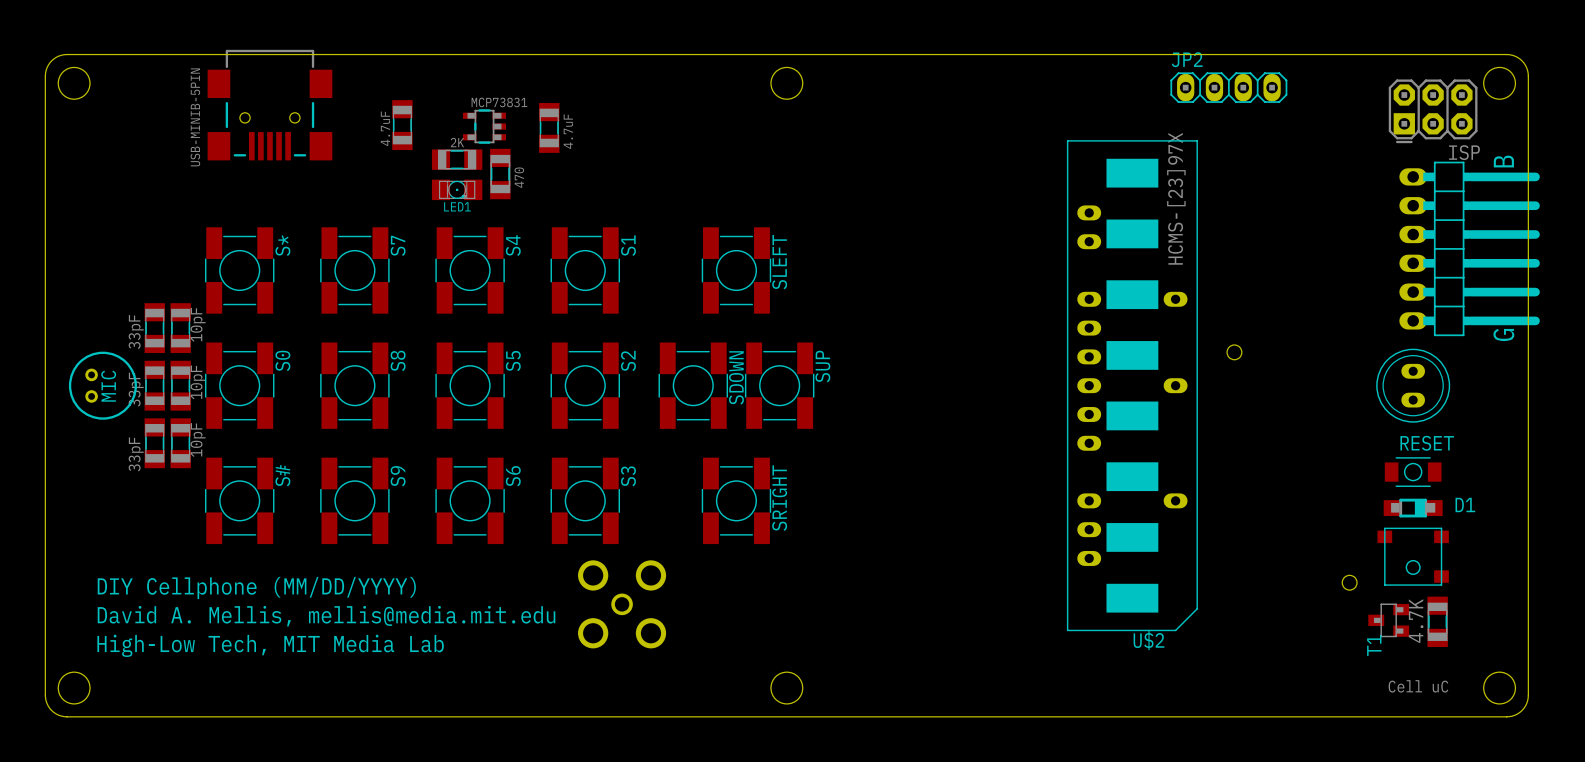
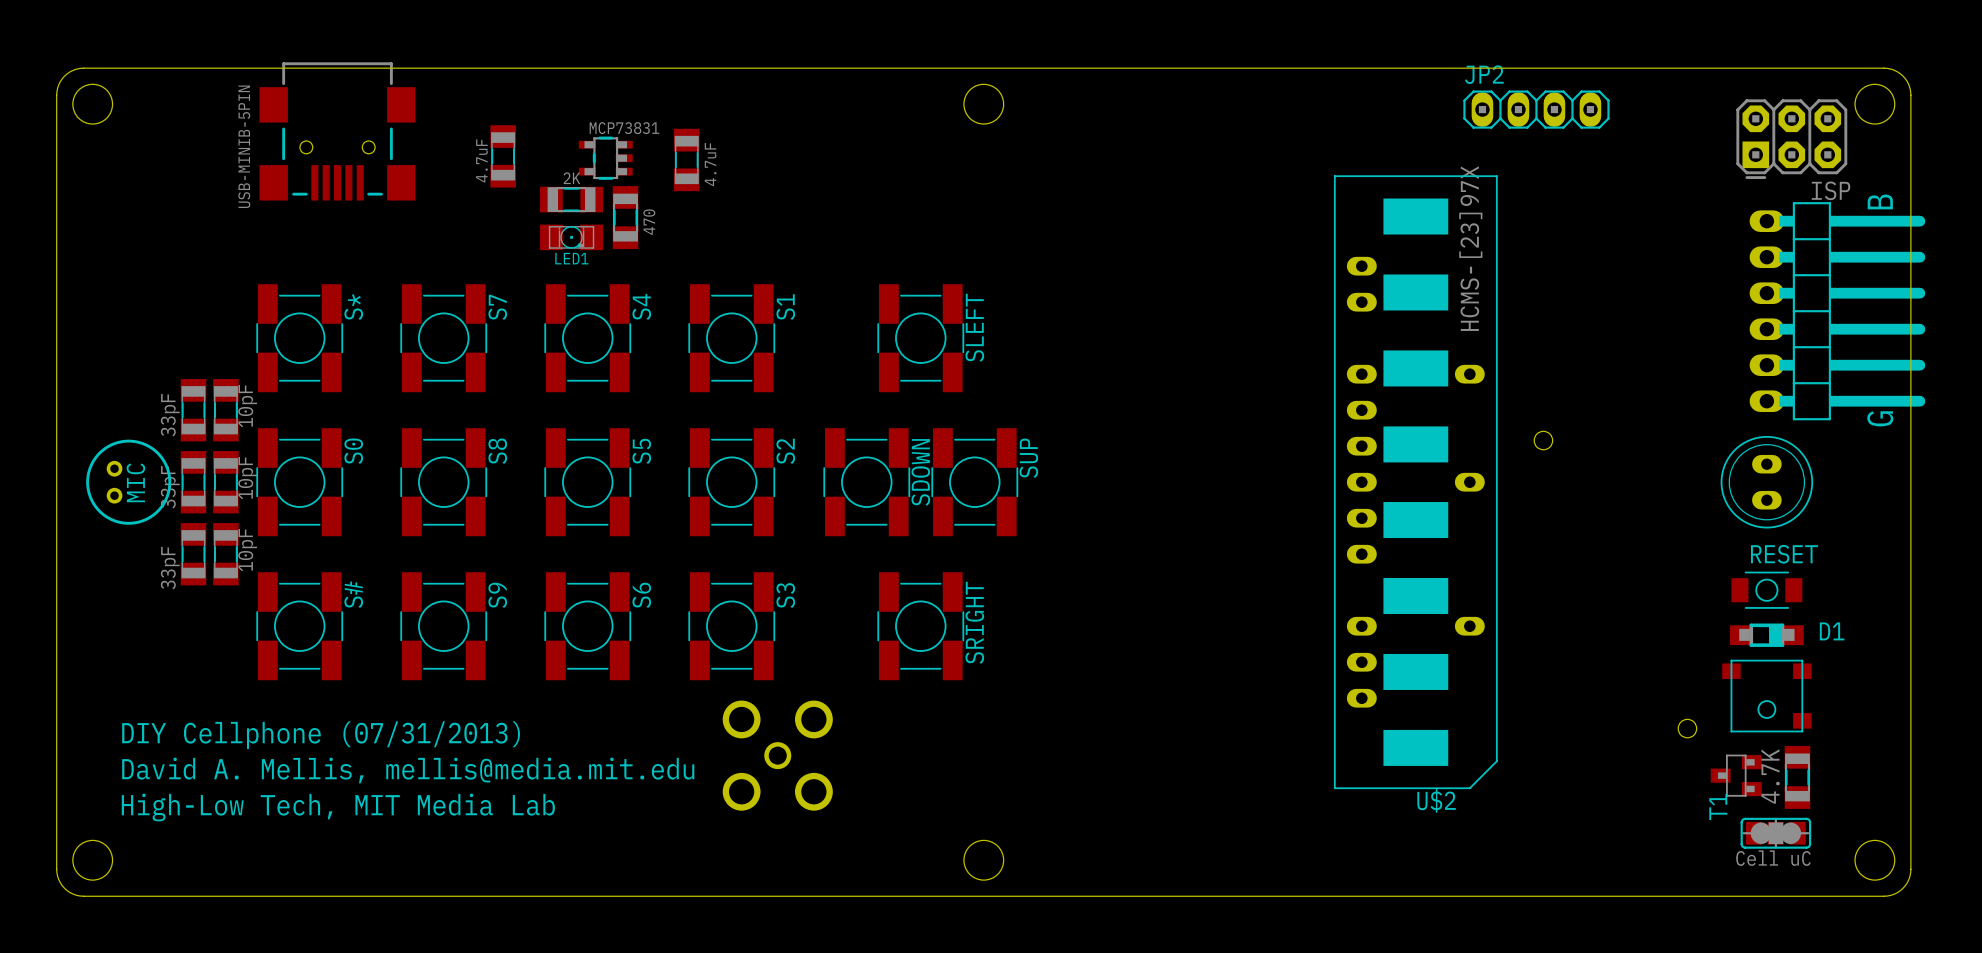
text: DIY Cellphone (MM/DD/YYYY) (256, 587) -> DIY Cellphone (07/31/2013) (321, 735)
part: none -> (1775, 833)

